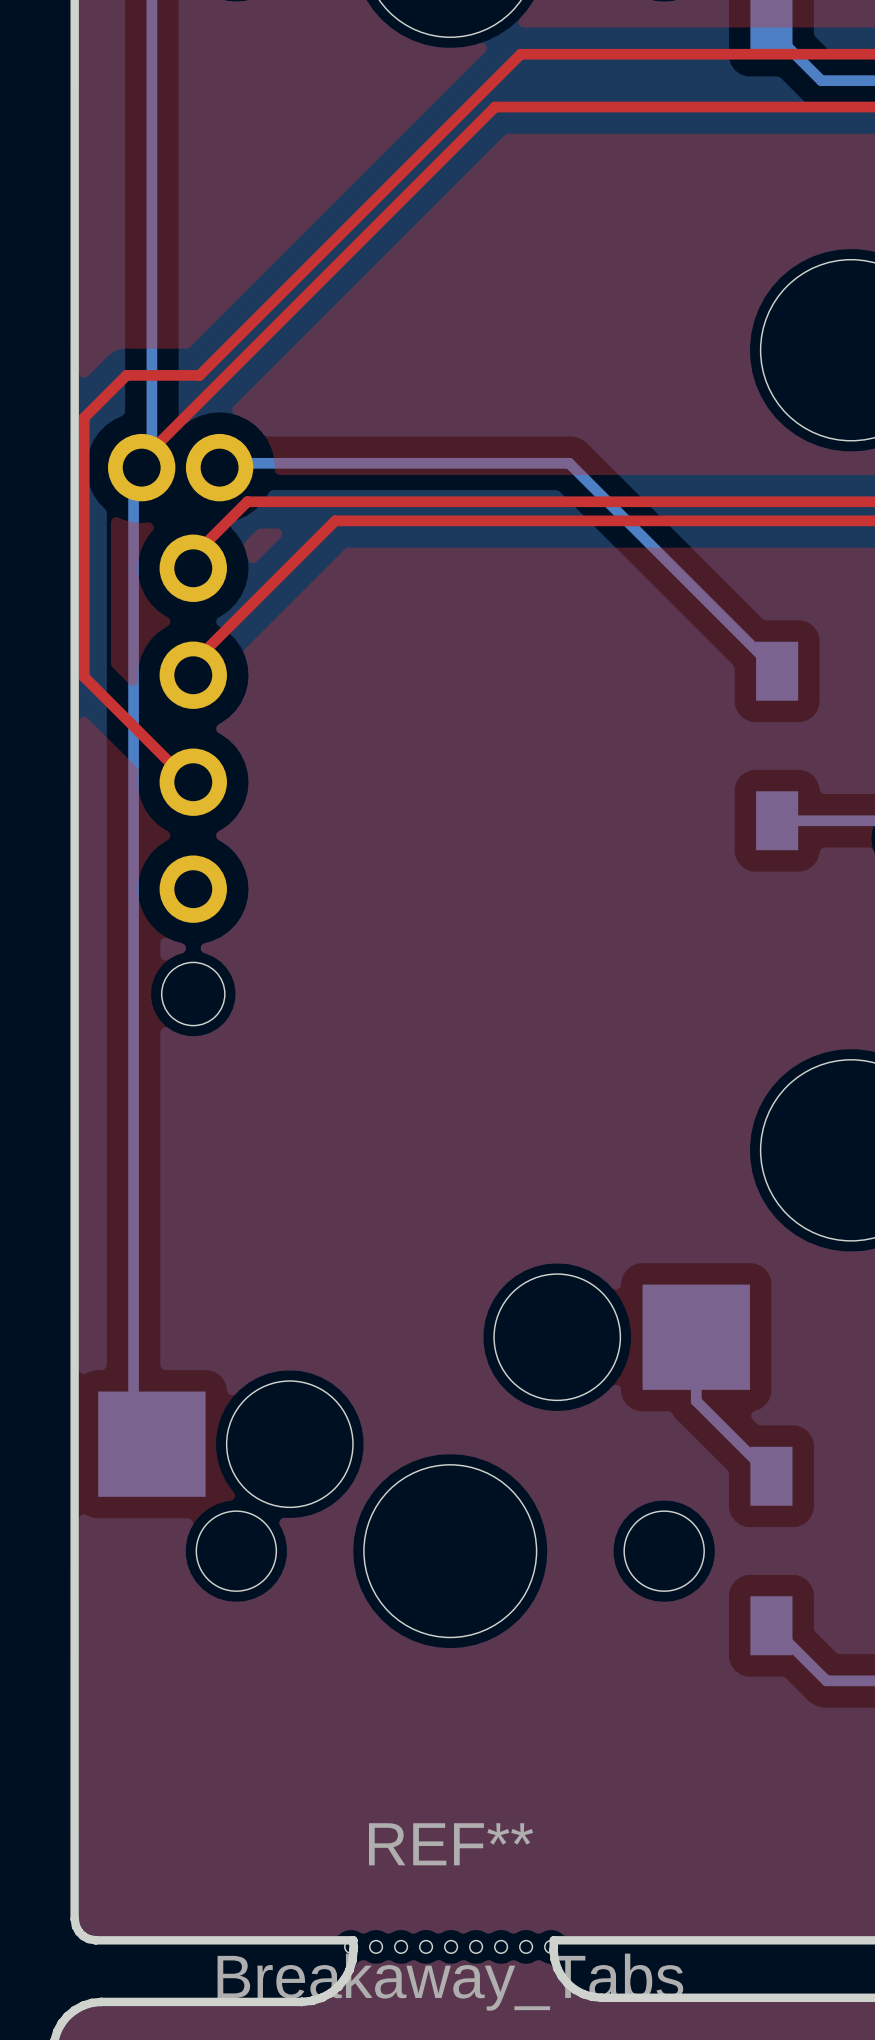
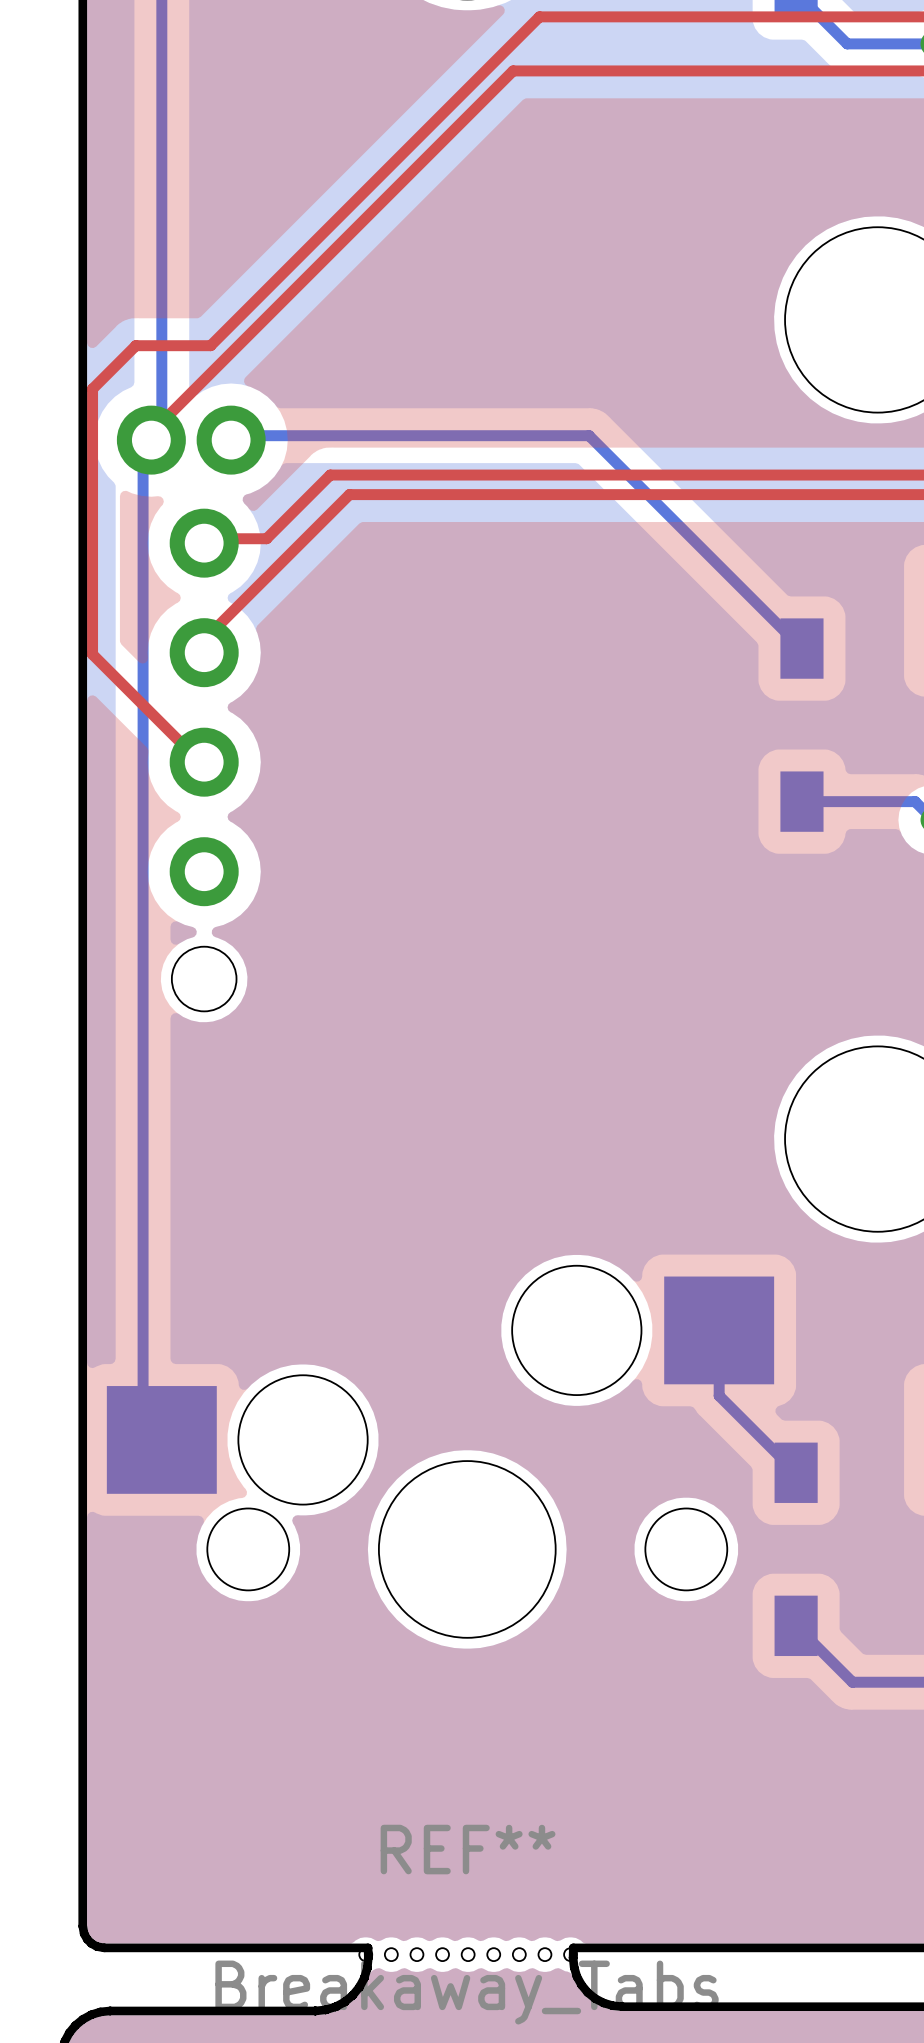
top track: (316, 501) (247, 501) (185, 563) -> (330, 475) (266, 538) (195, 538)

